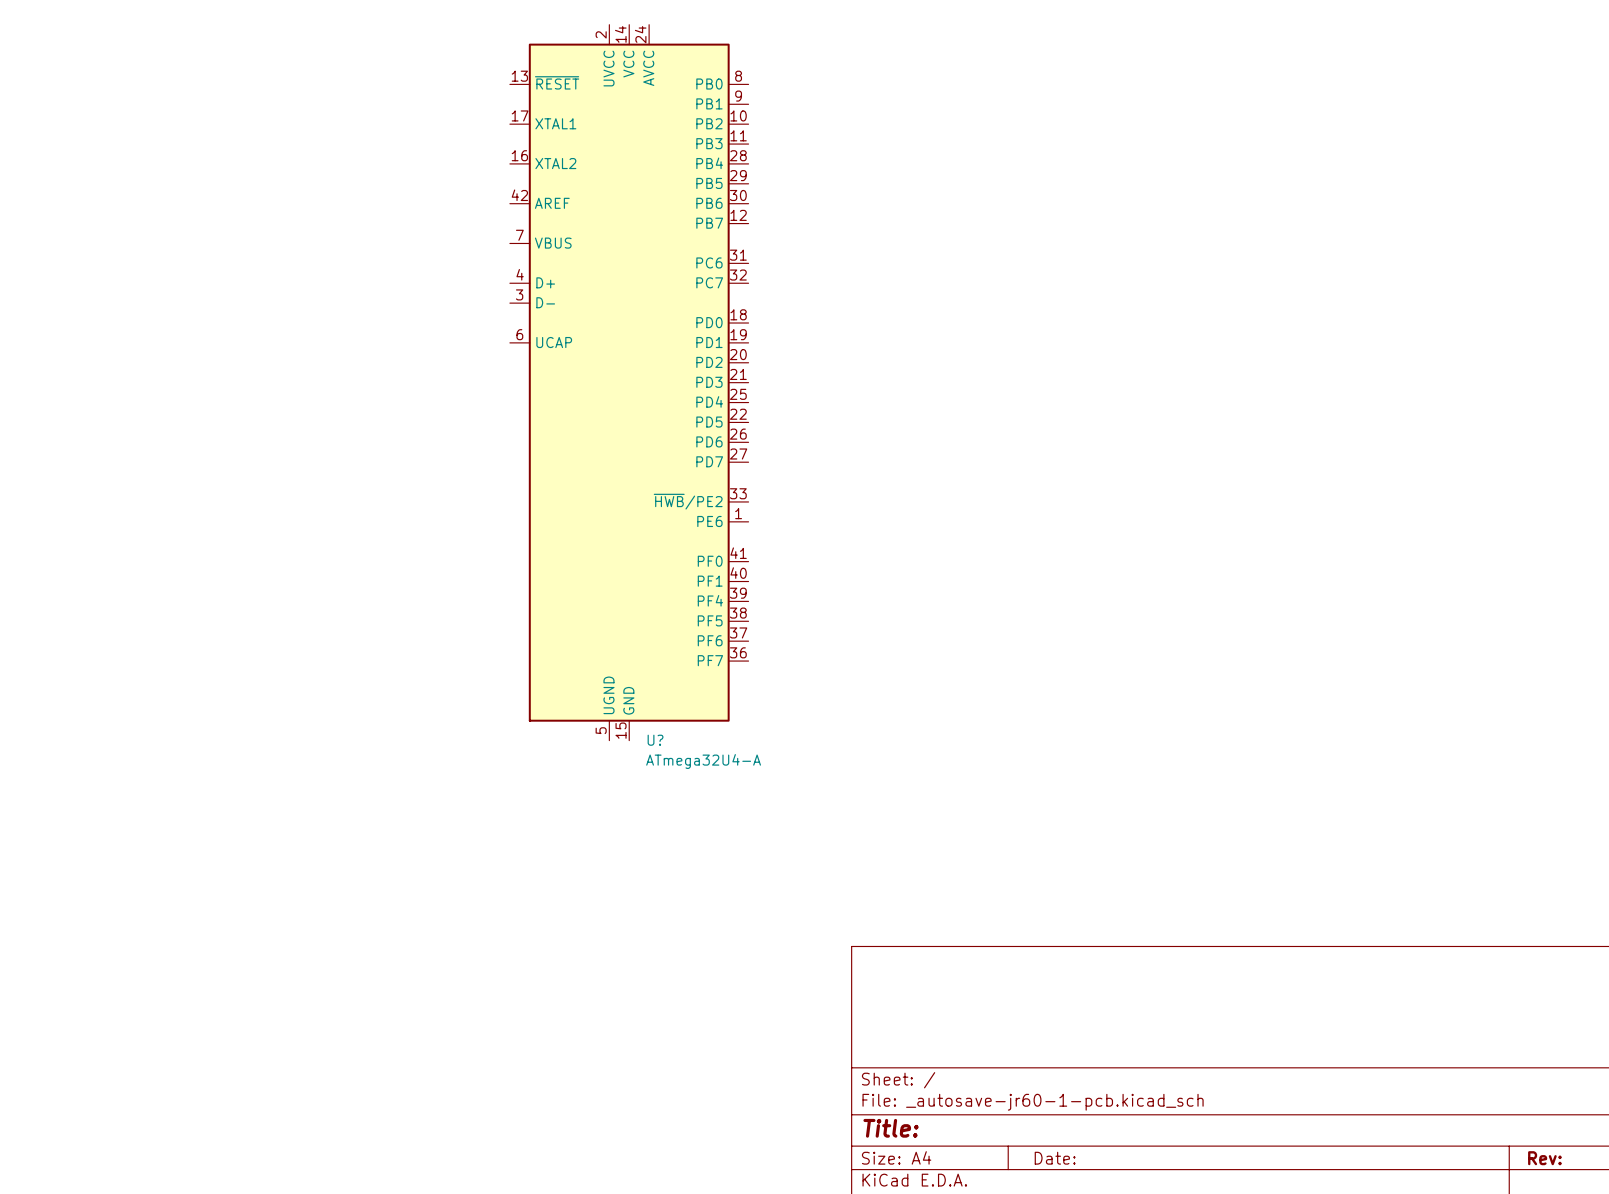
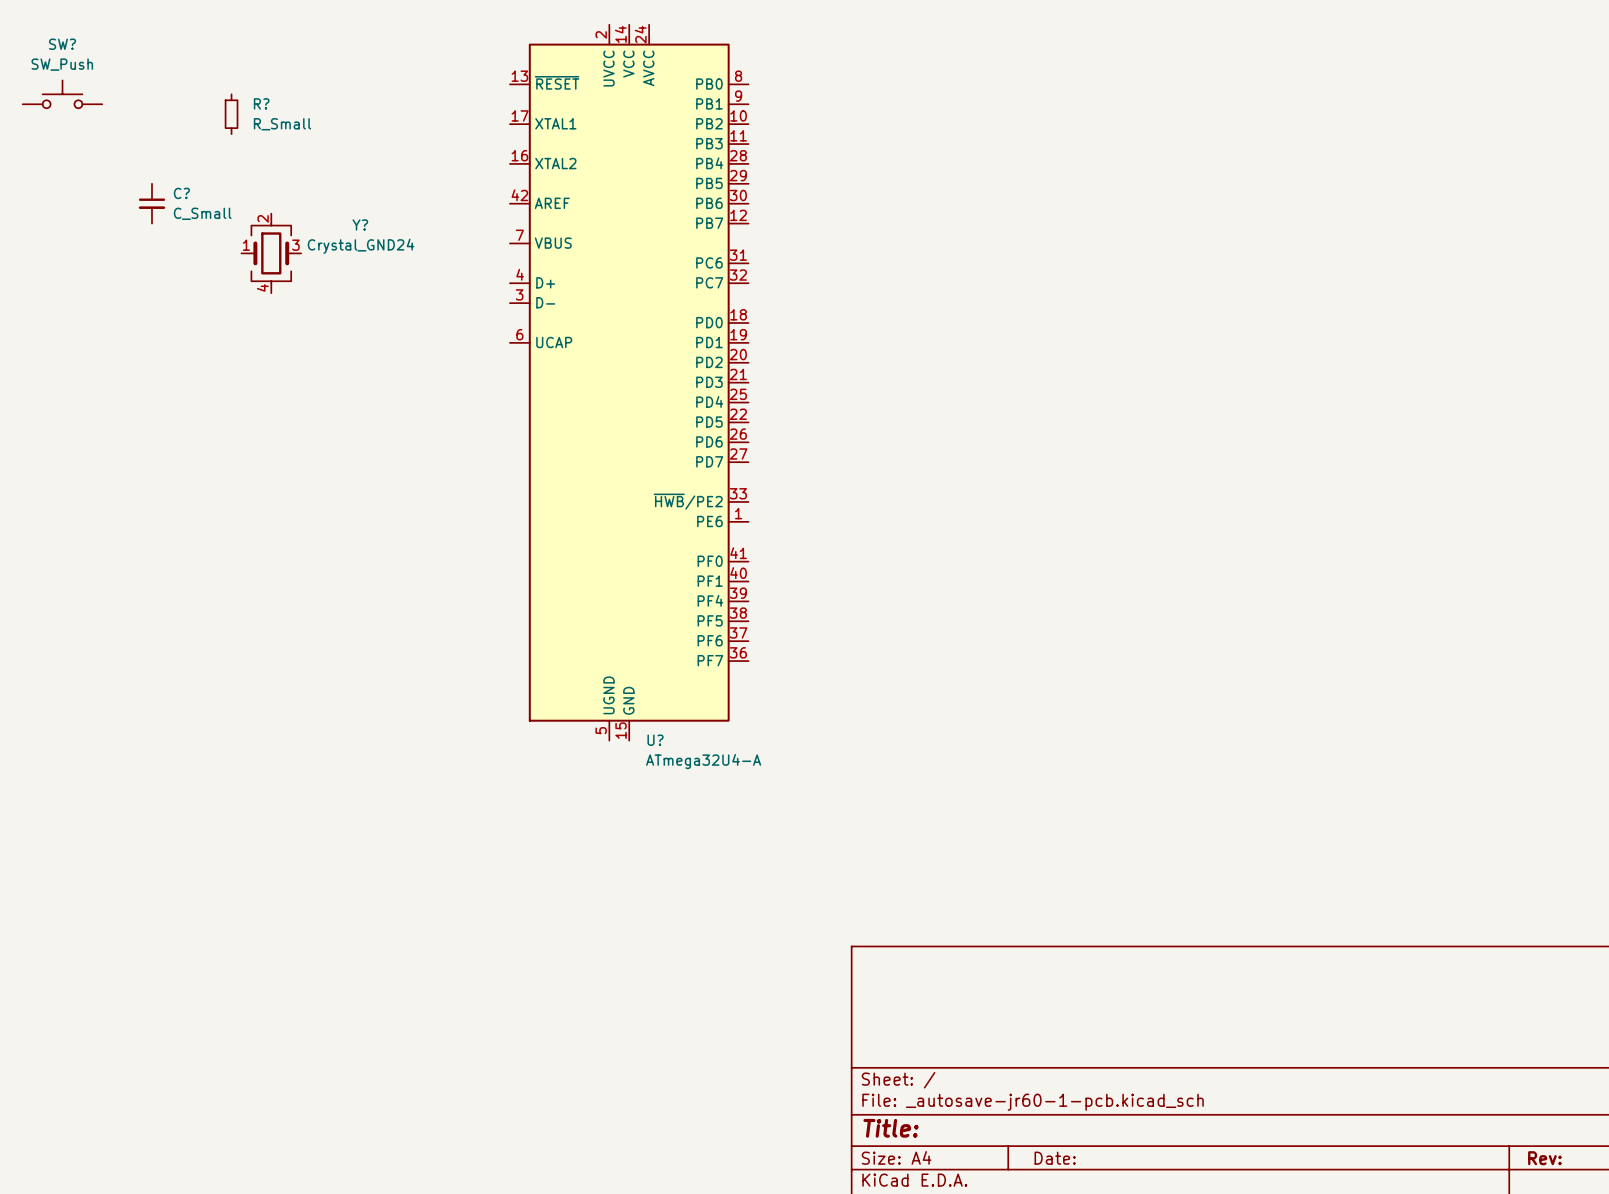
SW?: none -> SW_Push (62, 94)
R?: none -> R_Small (231, 114)
C?: none -> C_Small (151, 203)
Y?: none -> Crystal_GND24 (271, 253)

